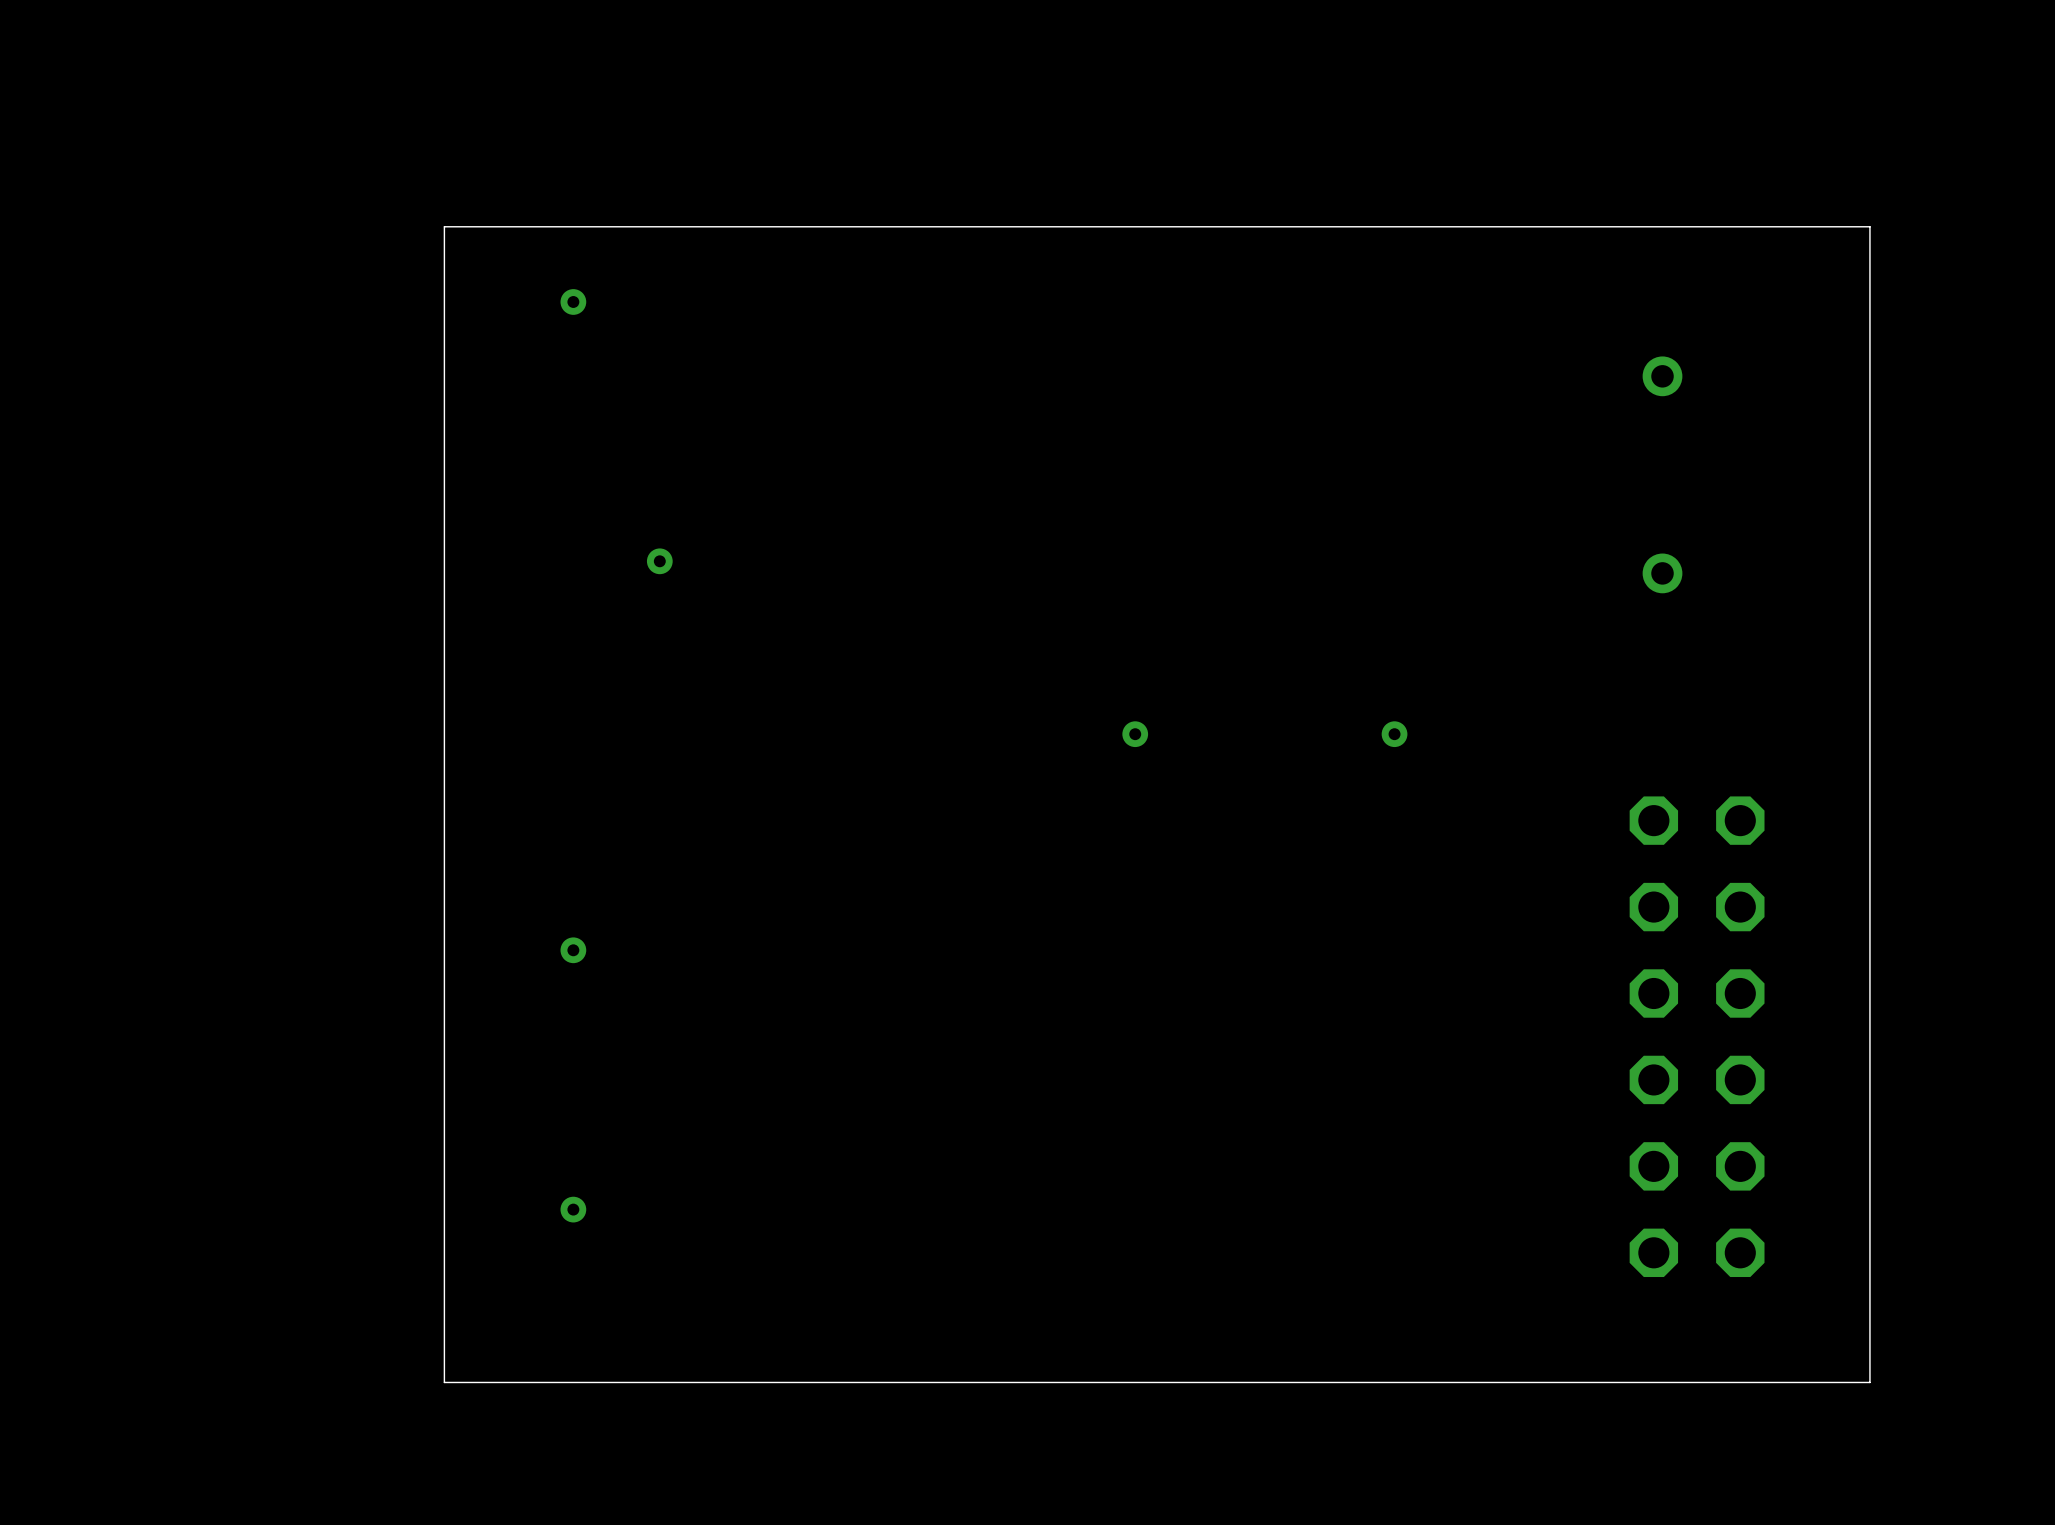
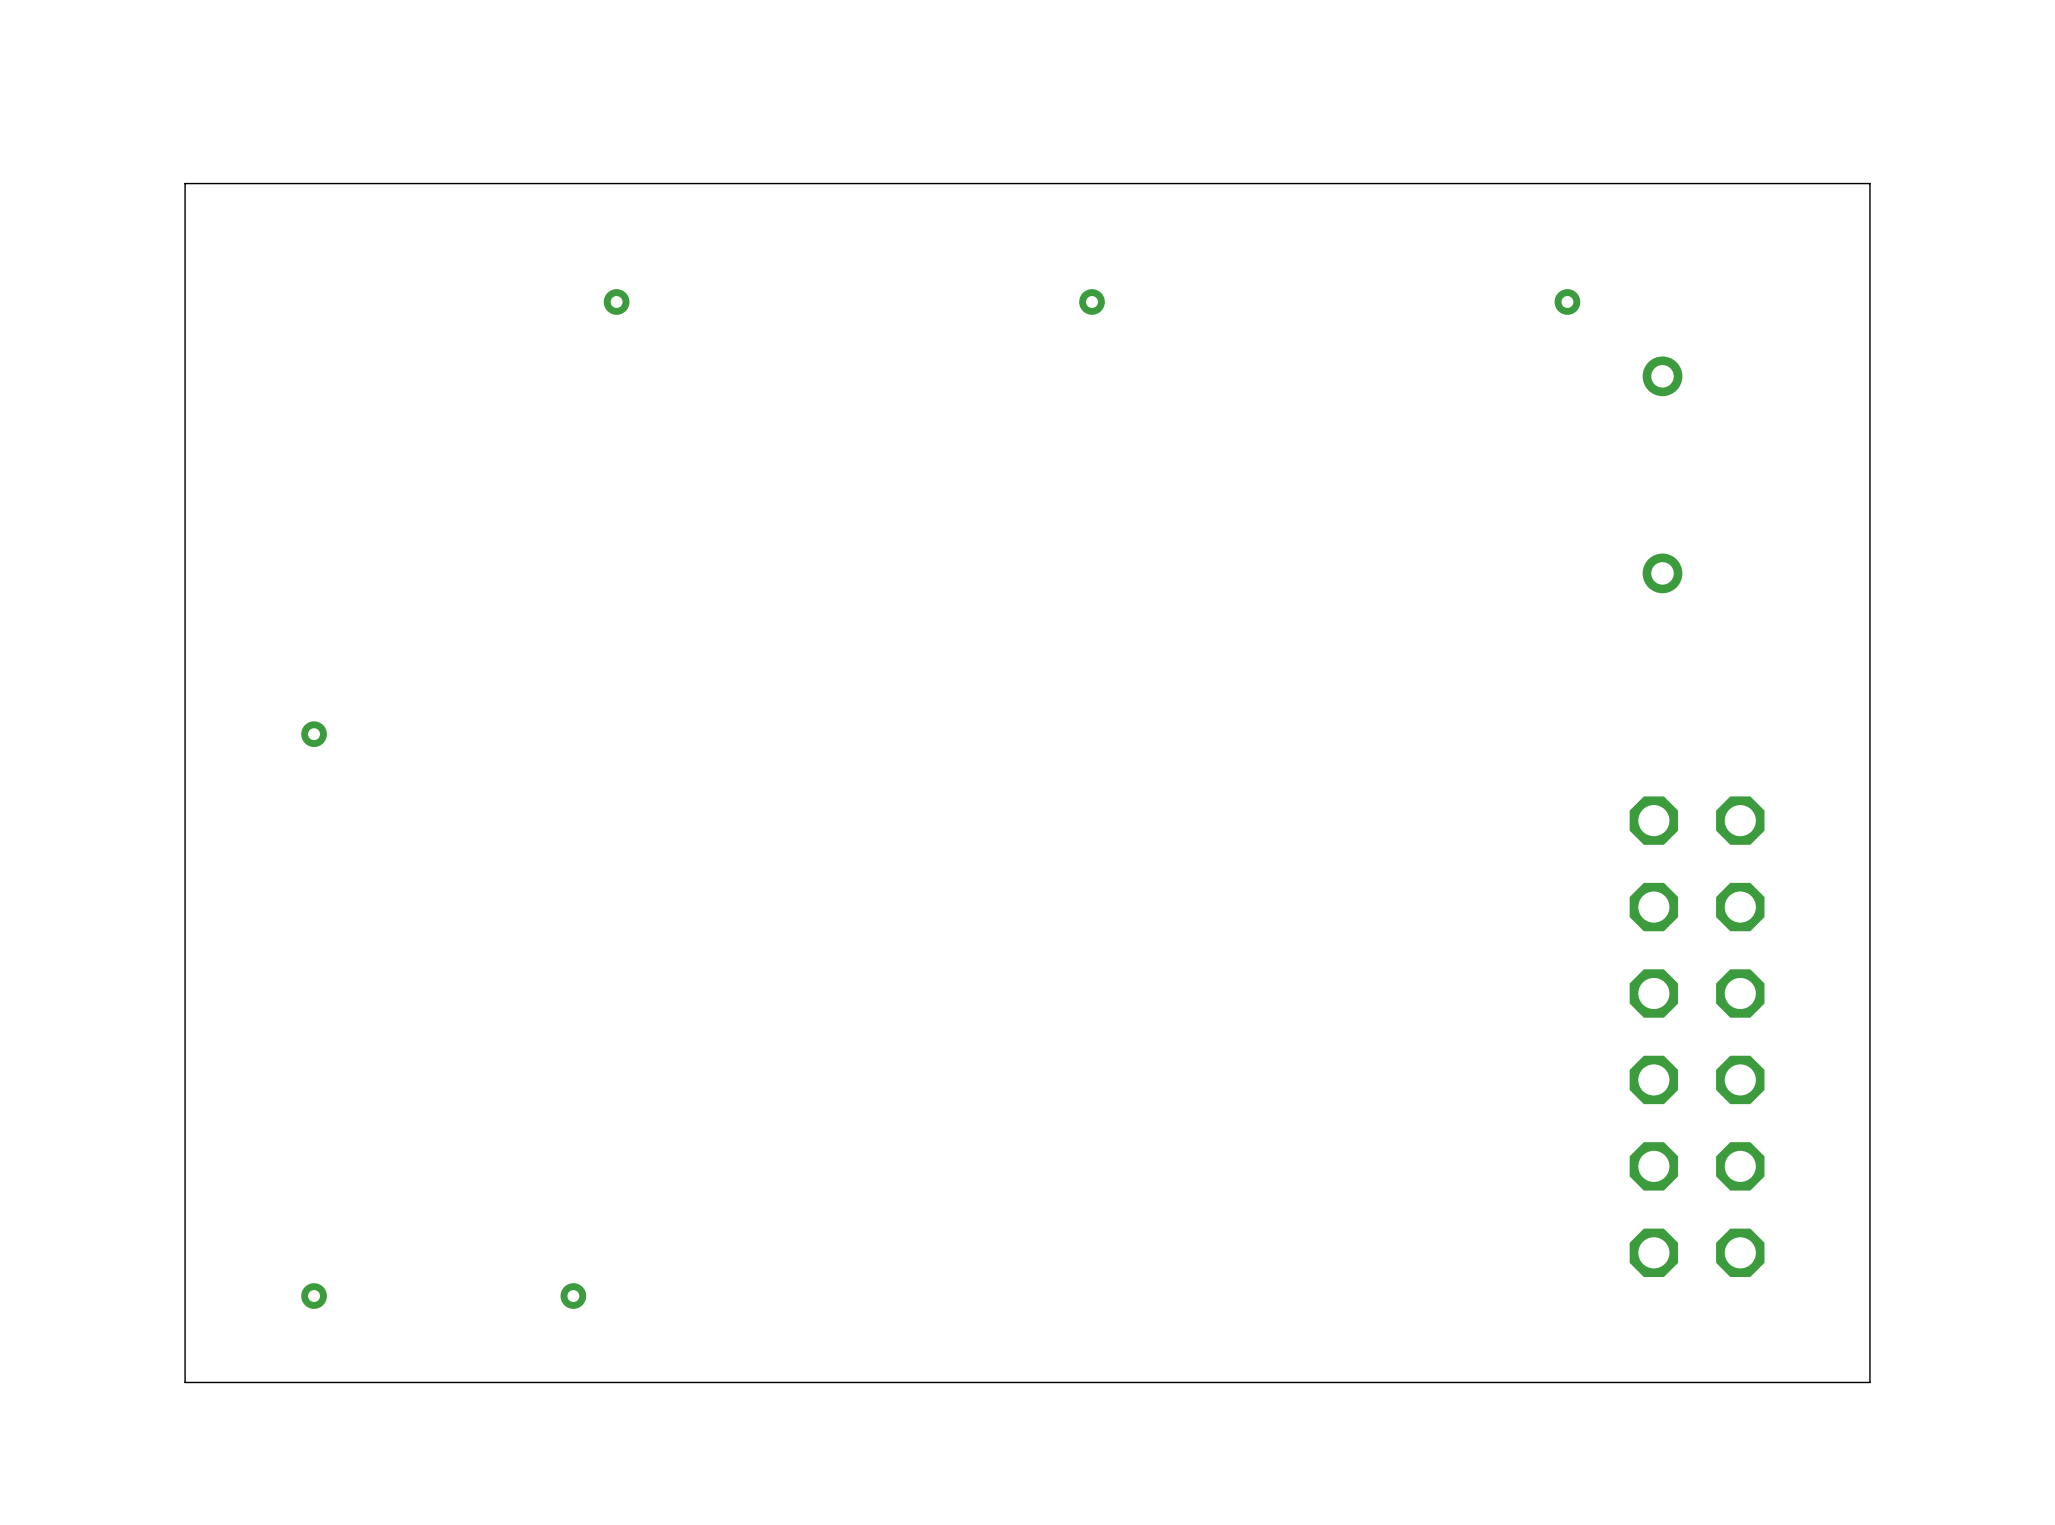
board edge: (1869, 226) (444, 226) (444, 1382) -> (1869, 226) (1869, 183) (185, 183) (185, 1382) (444, 1382)
via position: (573, 301) -> (616, 301)
via: none -> (1092, 301)
via: none -> (1567, 301)
via: (659, 561) -> none
via: none -> (314, 734)
via: (1135, 734) -> none
via: (1394, 734) -> none
via: (573, 950) -> none
via position: (573, 1209) -> (573, 1296)
via: none -> (314, 1296)

